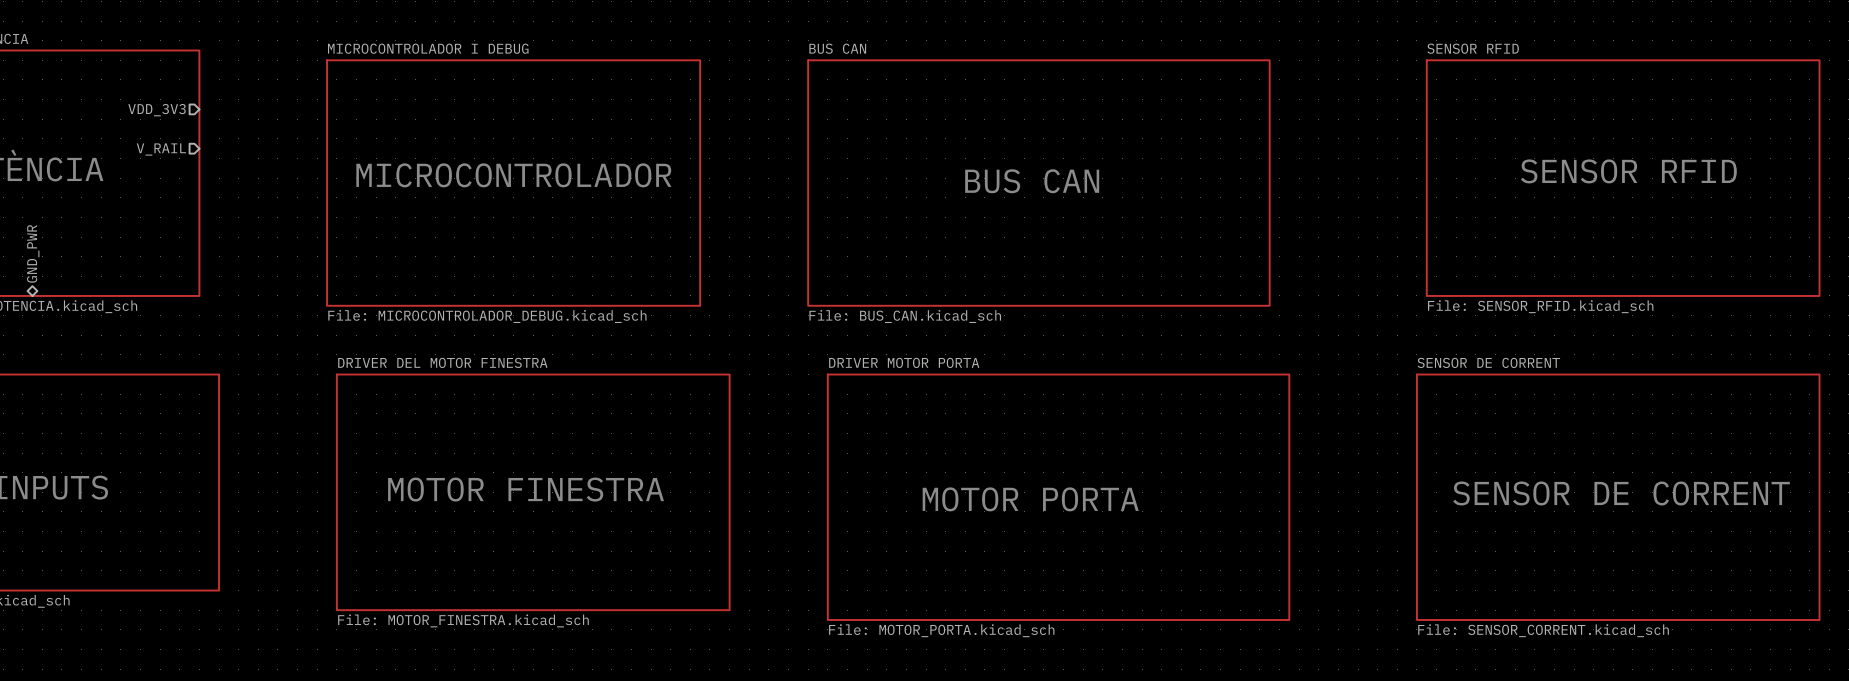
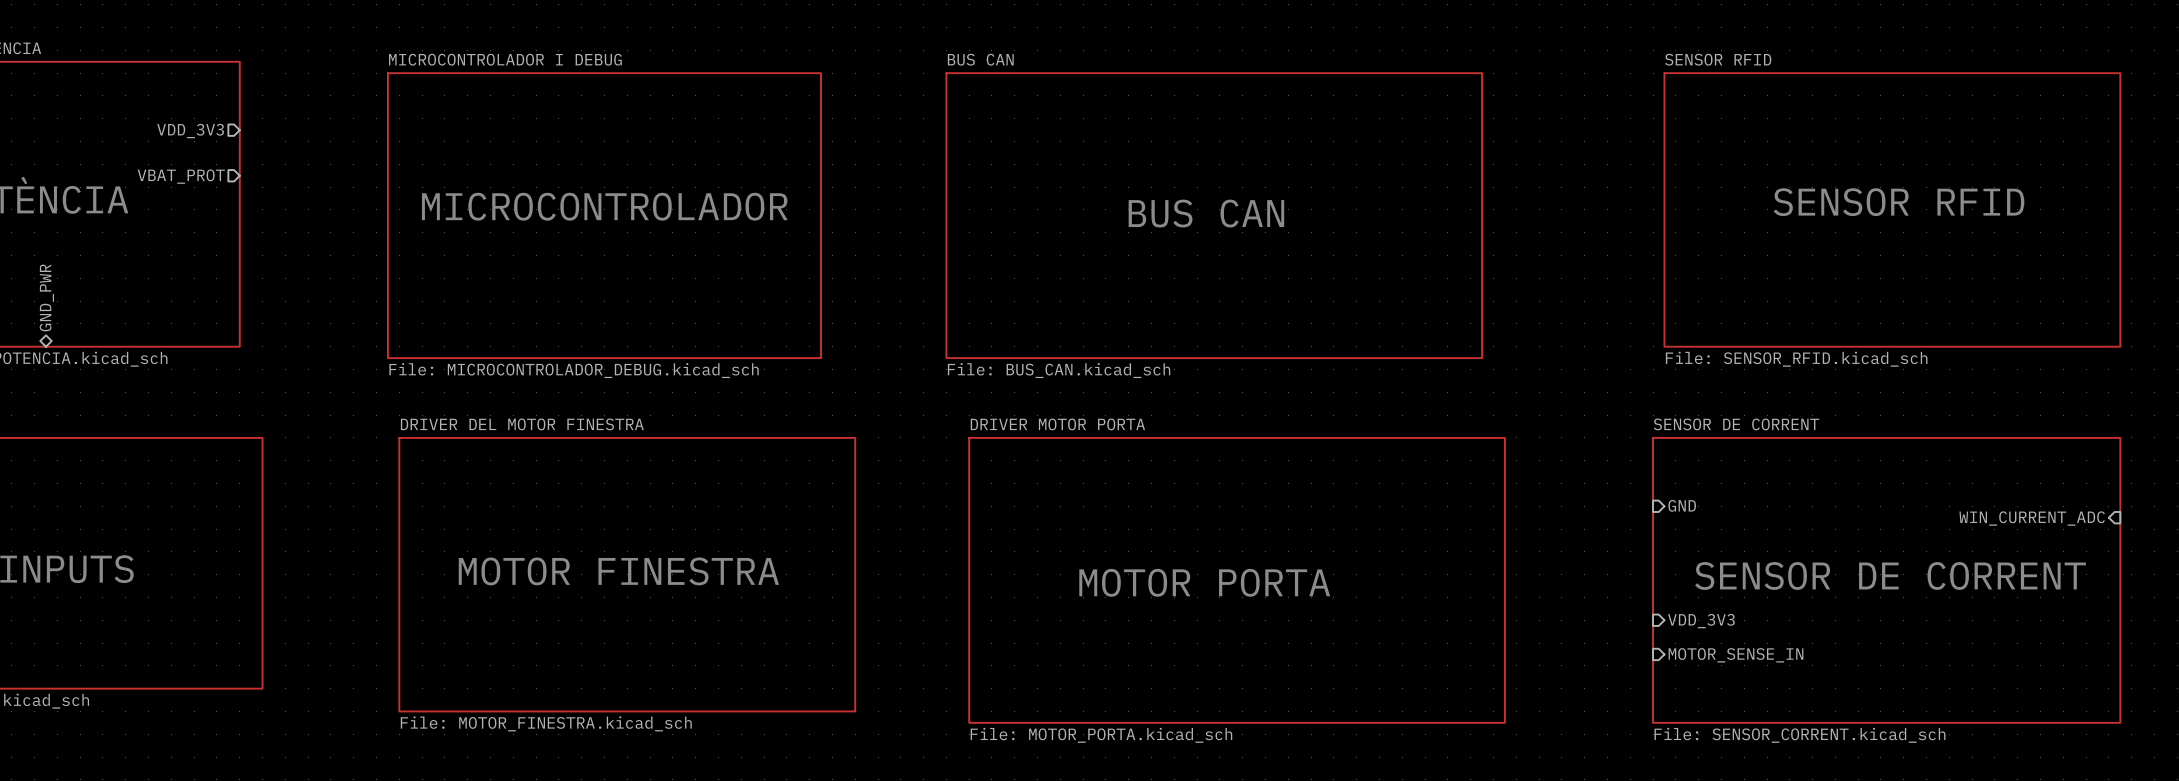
sheet pin: V_RAIL (161, 149) -> VBAT_PROT (181, 176)
sheet pin: none -> GND (1682, 505)
sheet pin: none -> WIN_CURRENT_ADC (2032, 518)
sheet pin: none -> VDD_3V3 (1701, 621)
sheet pin: none -> MOTOR_SENSE_IN (1736, 655)

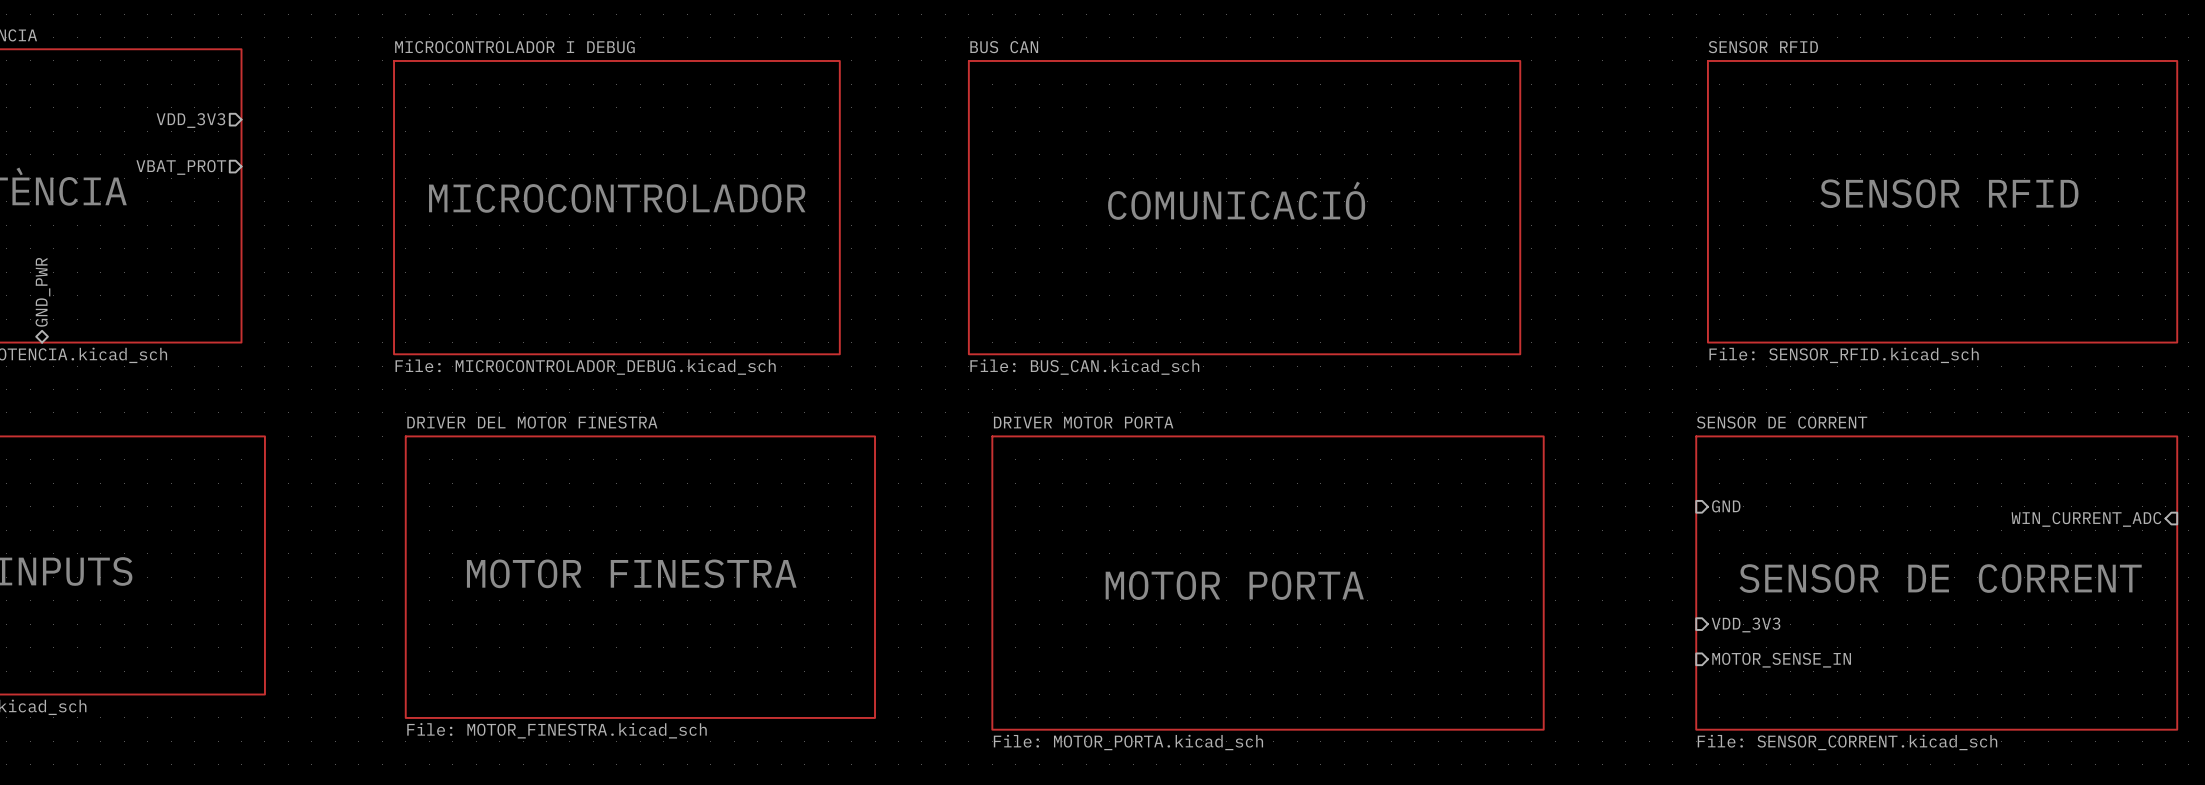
text: BUS CAN (1206, 213) -> COMUNICACIÓ (1236, 200)

